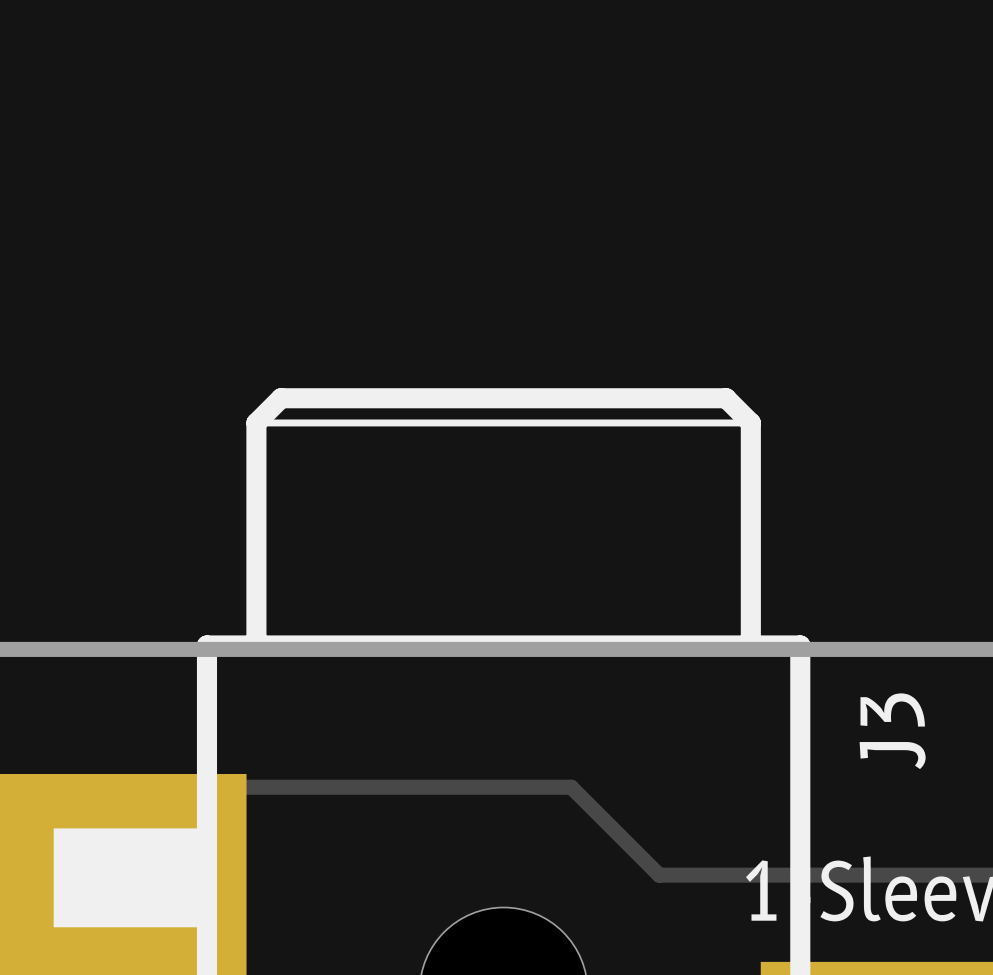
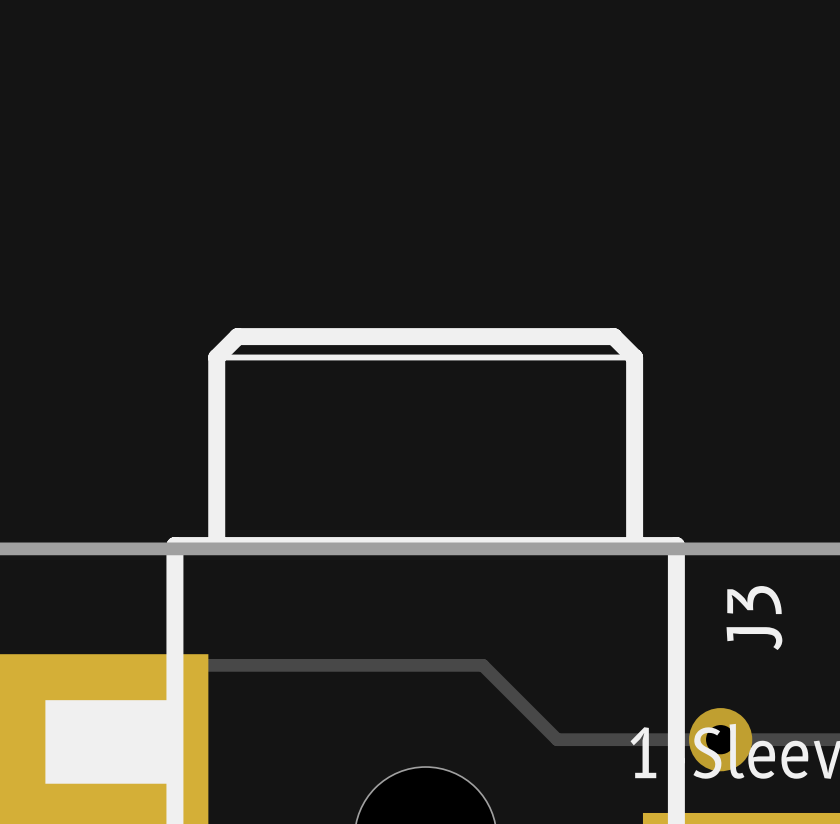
via: none -> (720, 739)

